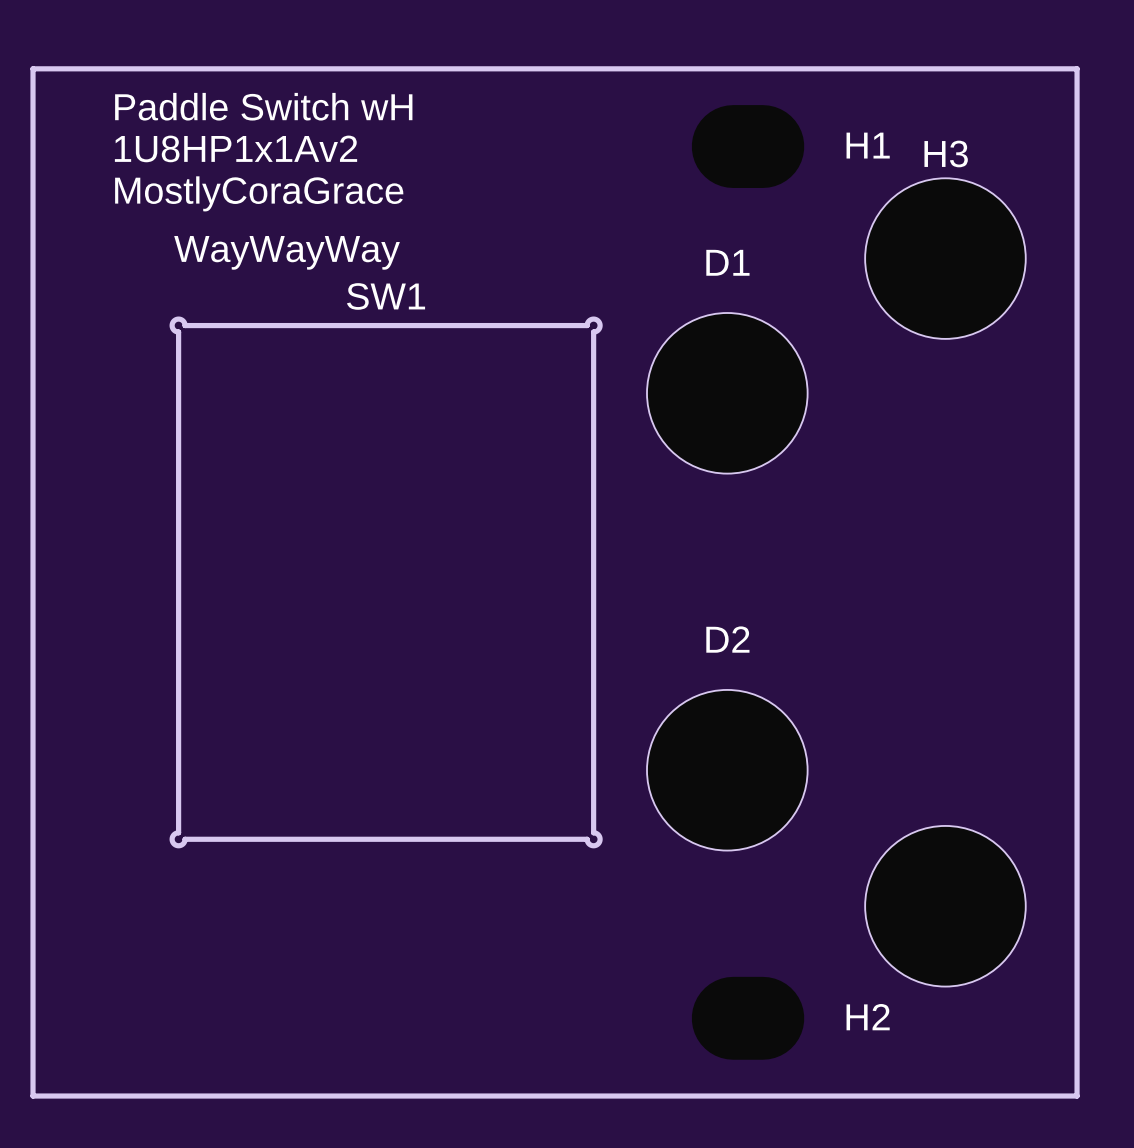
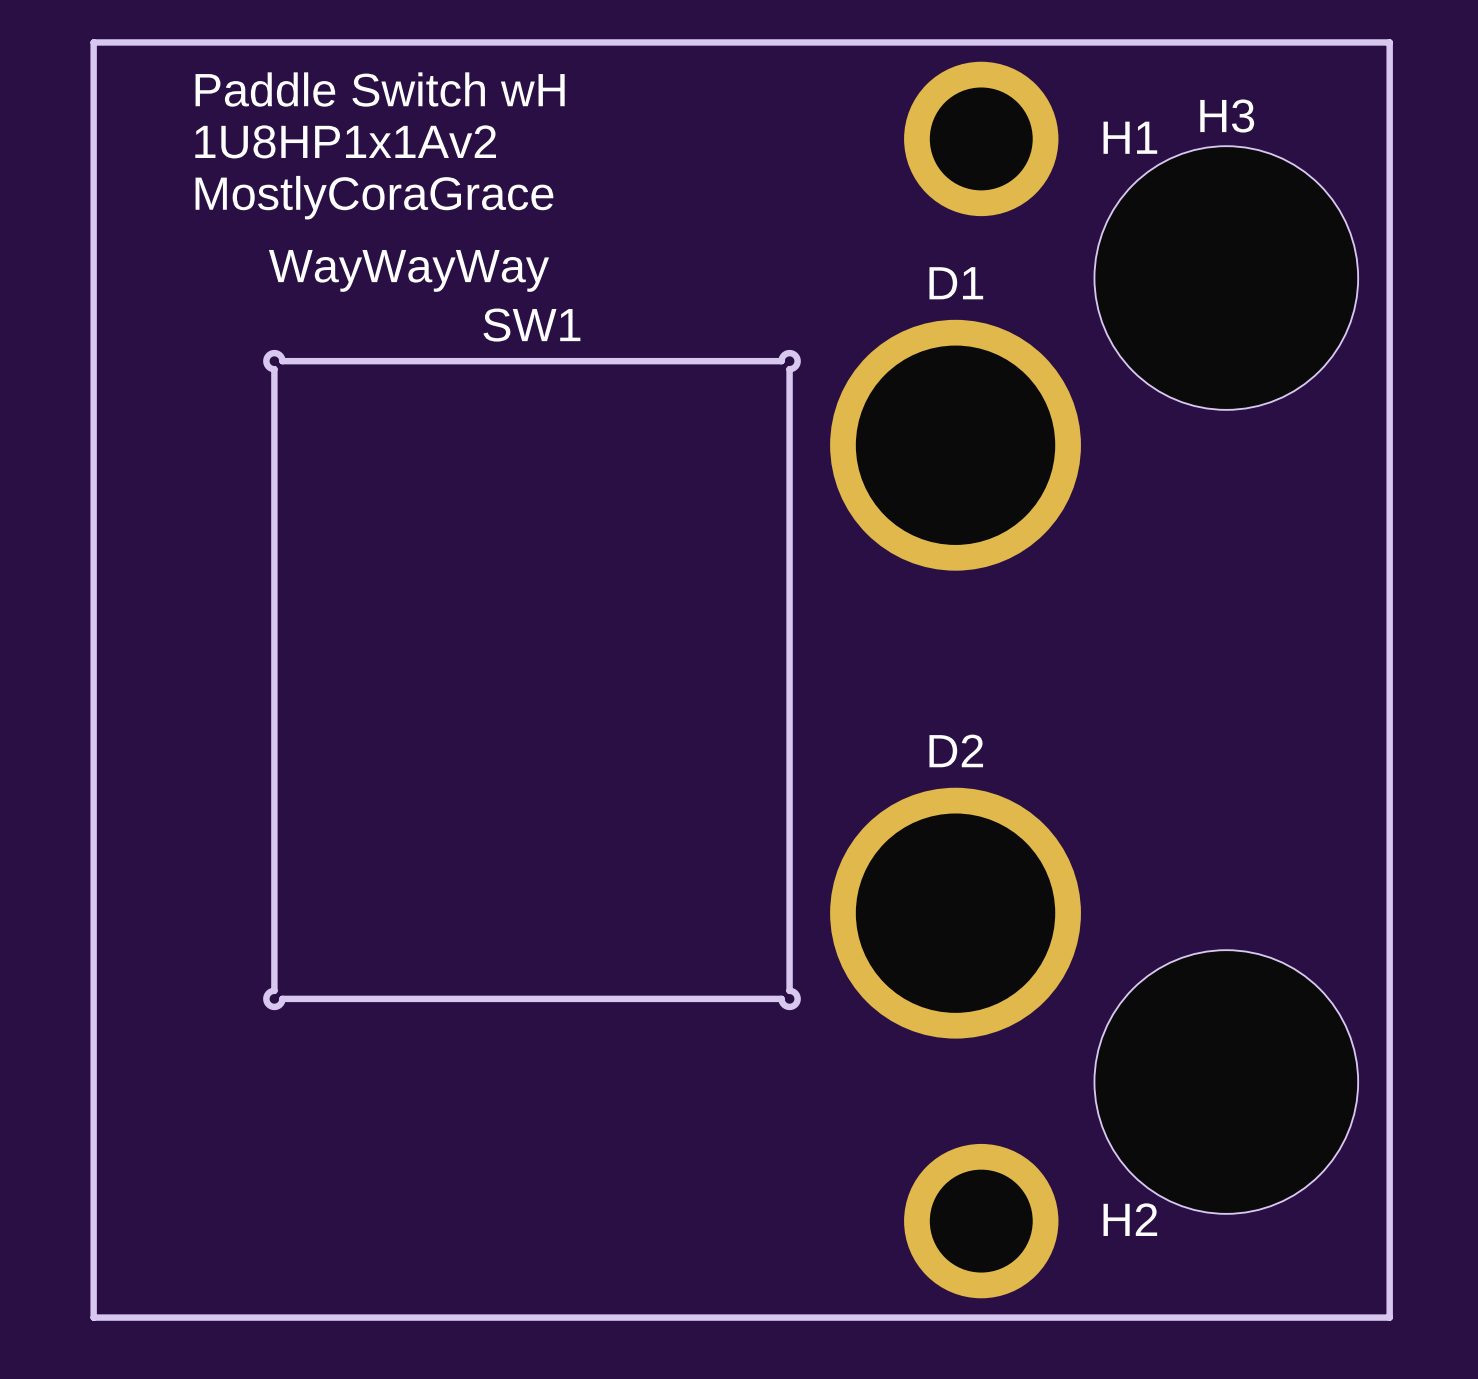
H1 footprint: [691, 105, 805, 188] -> [904, 61, 1059, 217]
H3 footprint: [865, 178, 1026, 987] -> [1094, 146, 1359, 1214]
D1 footprint: [646, 312, 808, 474] -> [830, 319, 1081, 571]
D2 footprint: [646, 689, 808, 851] -> [830, 787, 1081, 1039]
H2 footprint: [691, 976, 805, 1060] -> [904, 1143, 1059, 1299]

